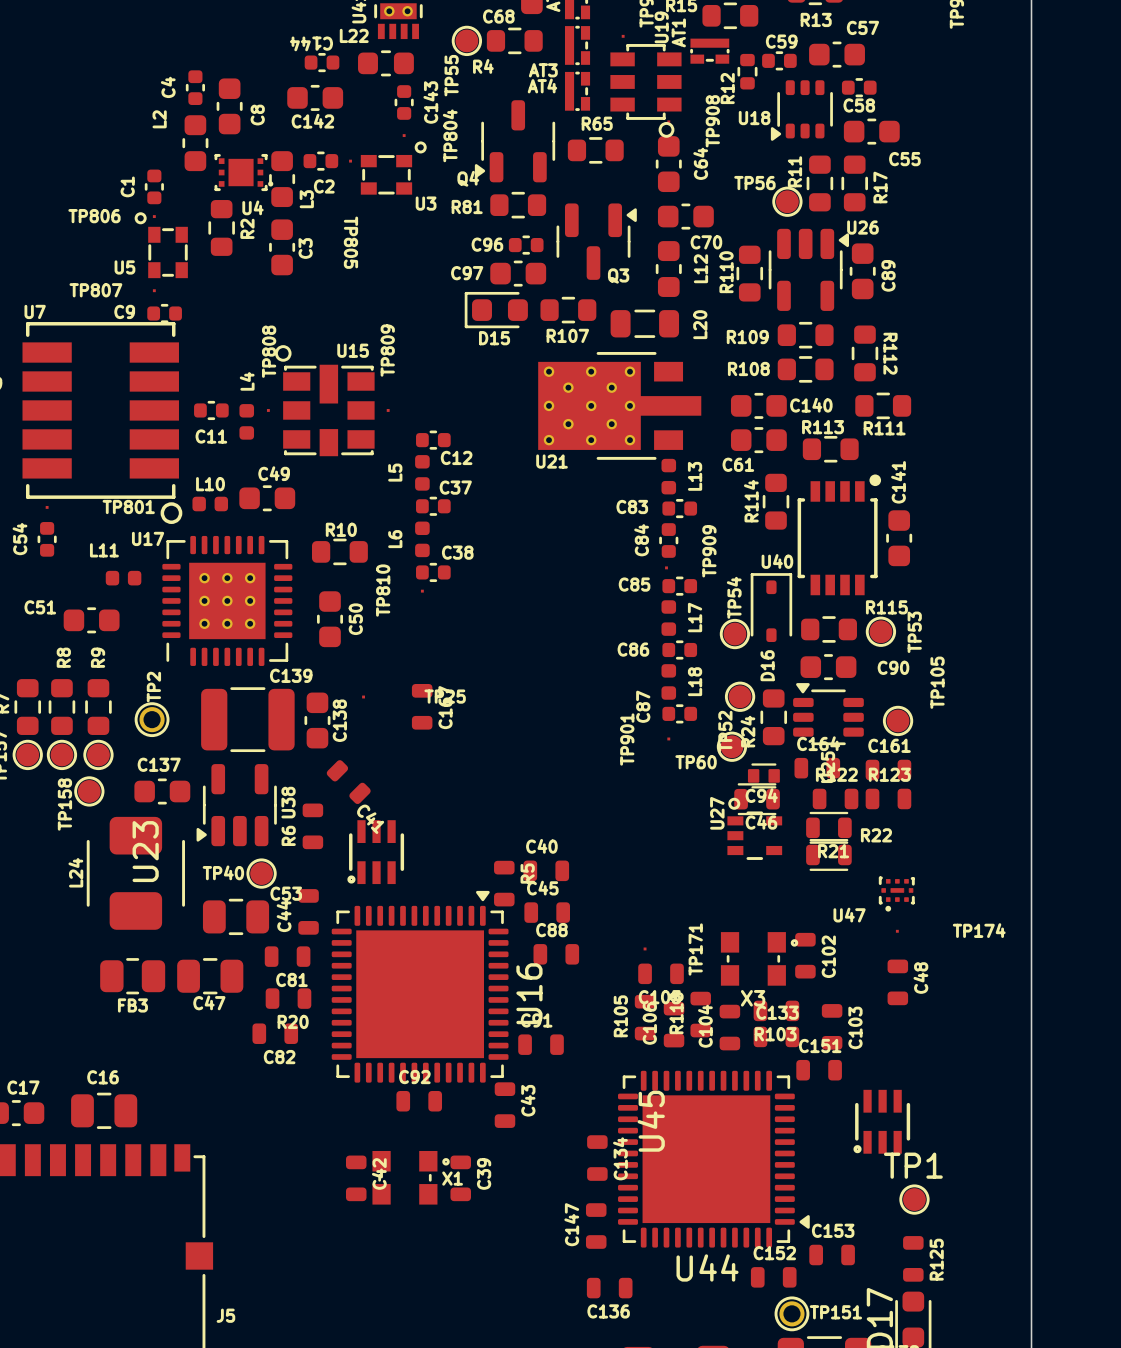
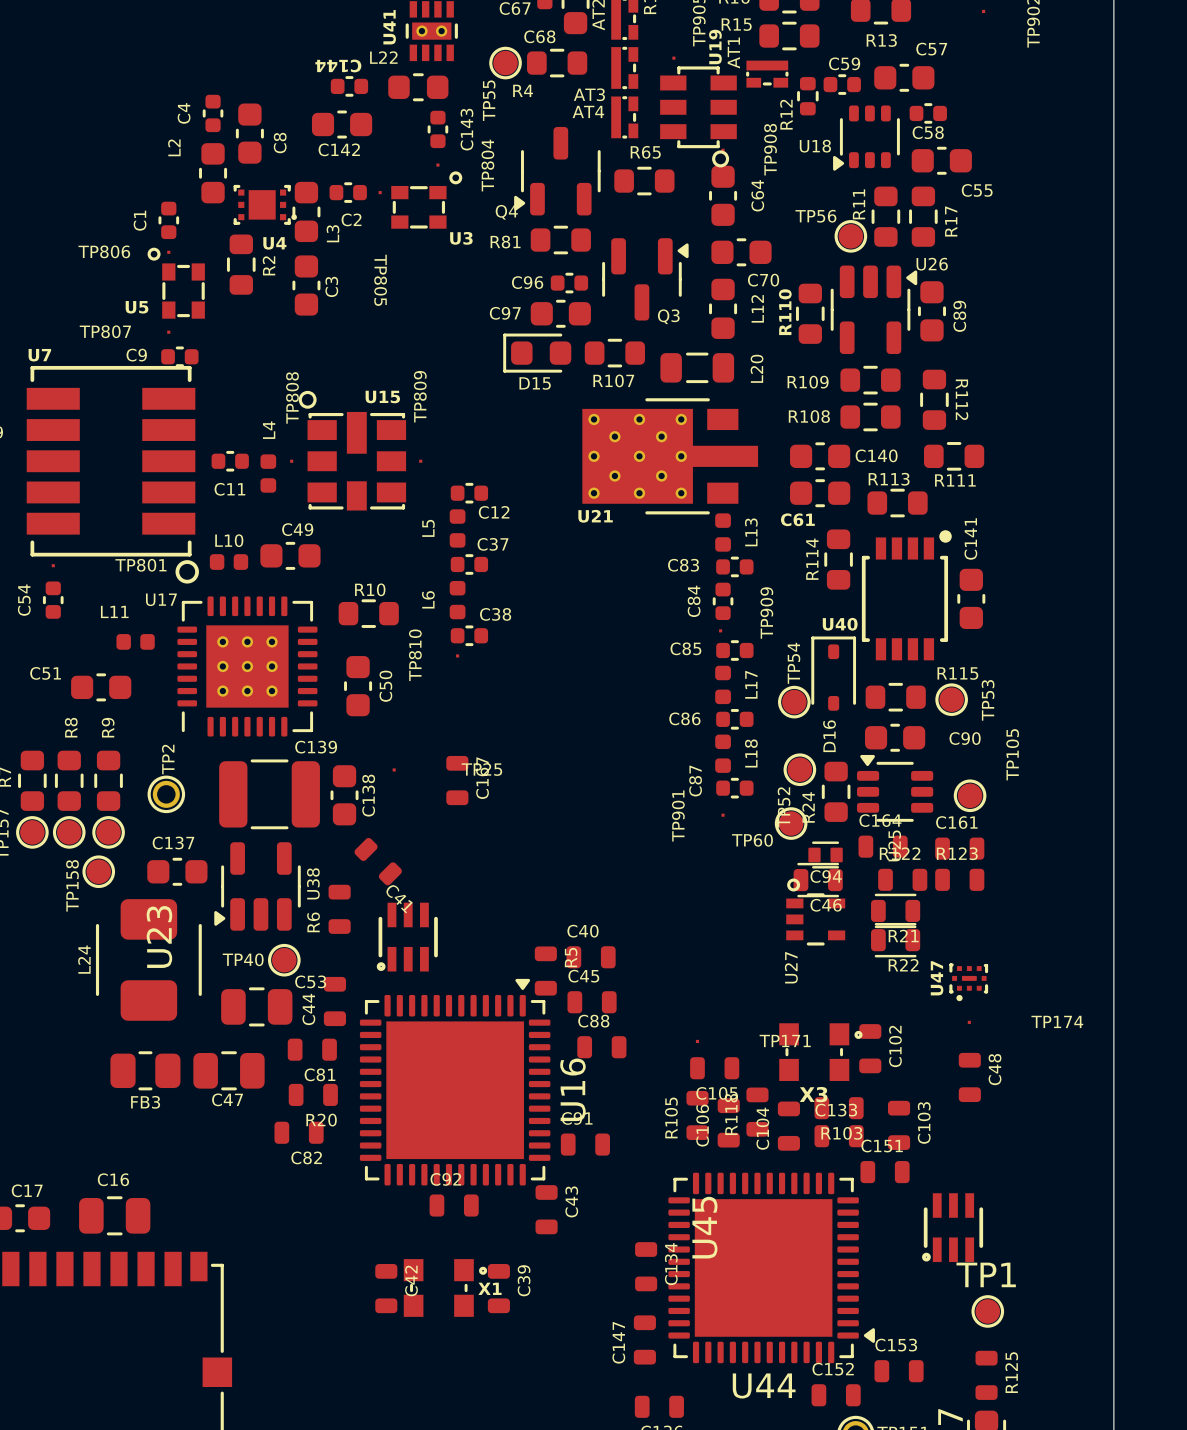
U27 name position: U27 (717, 813) -> U27 (791, 967)
R22 name position: R22 (876, 835) -> R22 (903, 965)
U47 name rotation: 0° (849, 915) -> 90° counterclockwise (937, 978)
TP171 name rotation: 0° (695, 949) -> 90° clockwise (785, 1040)

